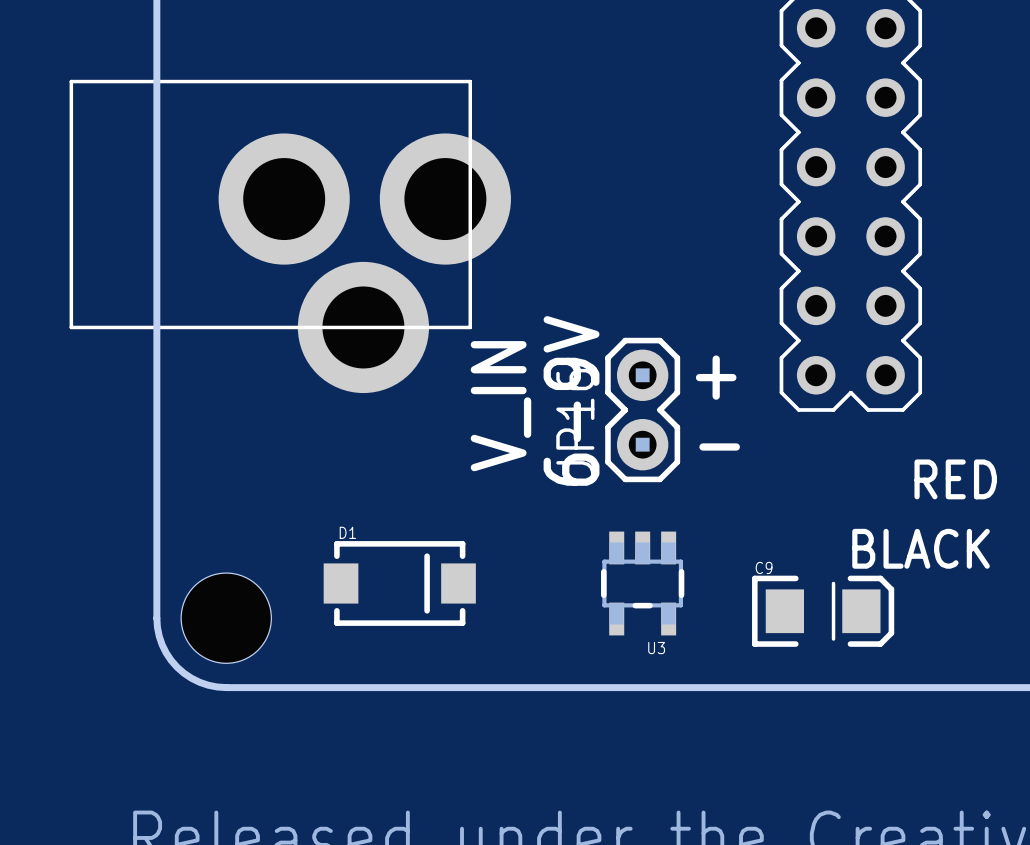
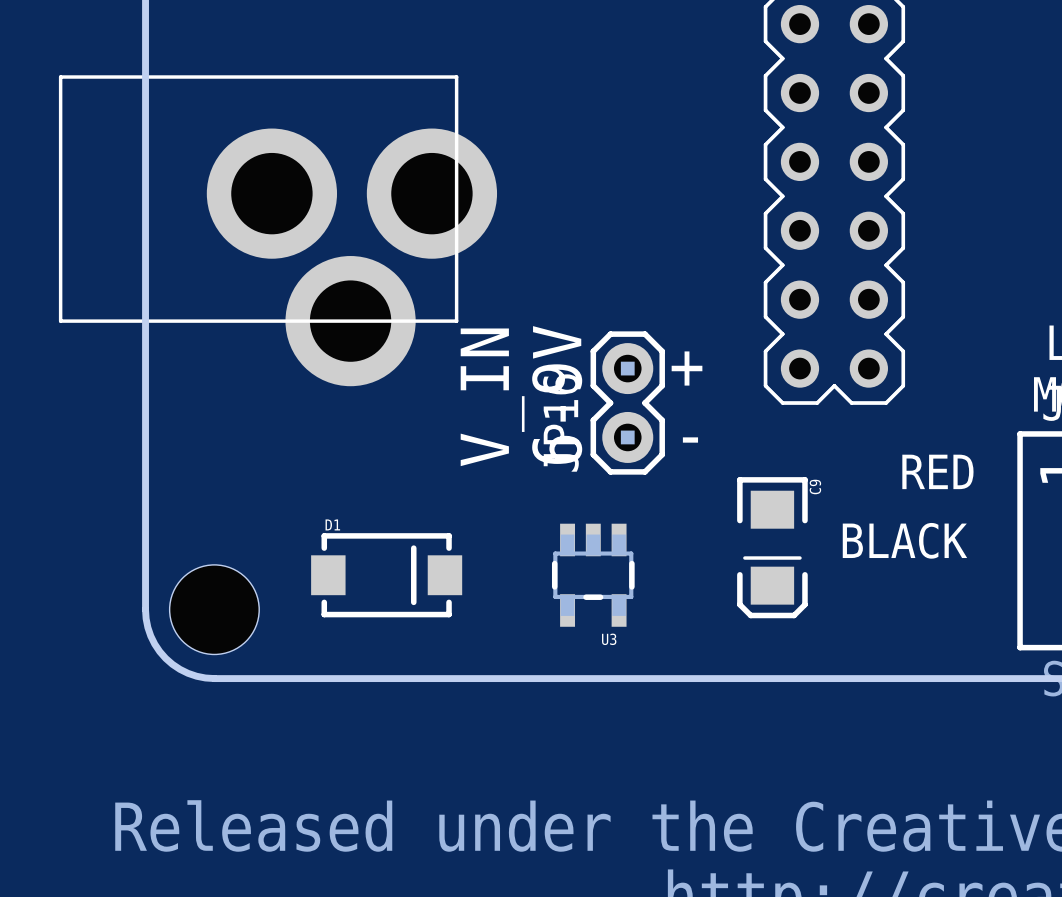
U3 position: (642, 583) -> (593, 575)
C9 rotation: 0° (823, 611) -> 90° clockwise (772, 547)

